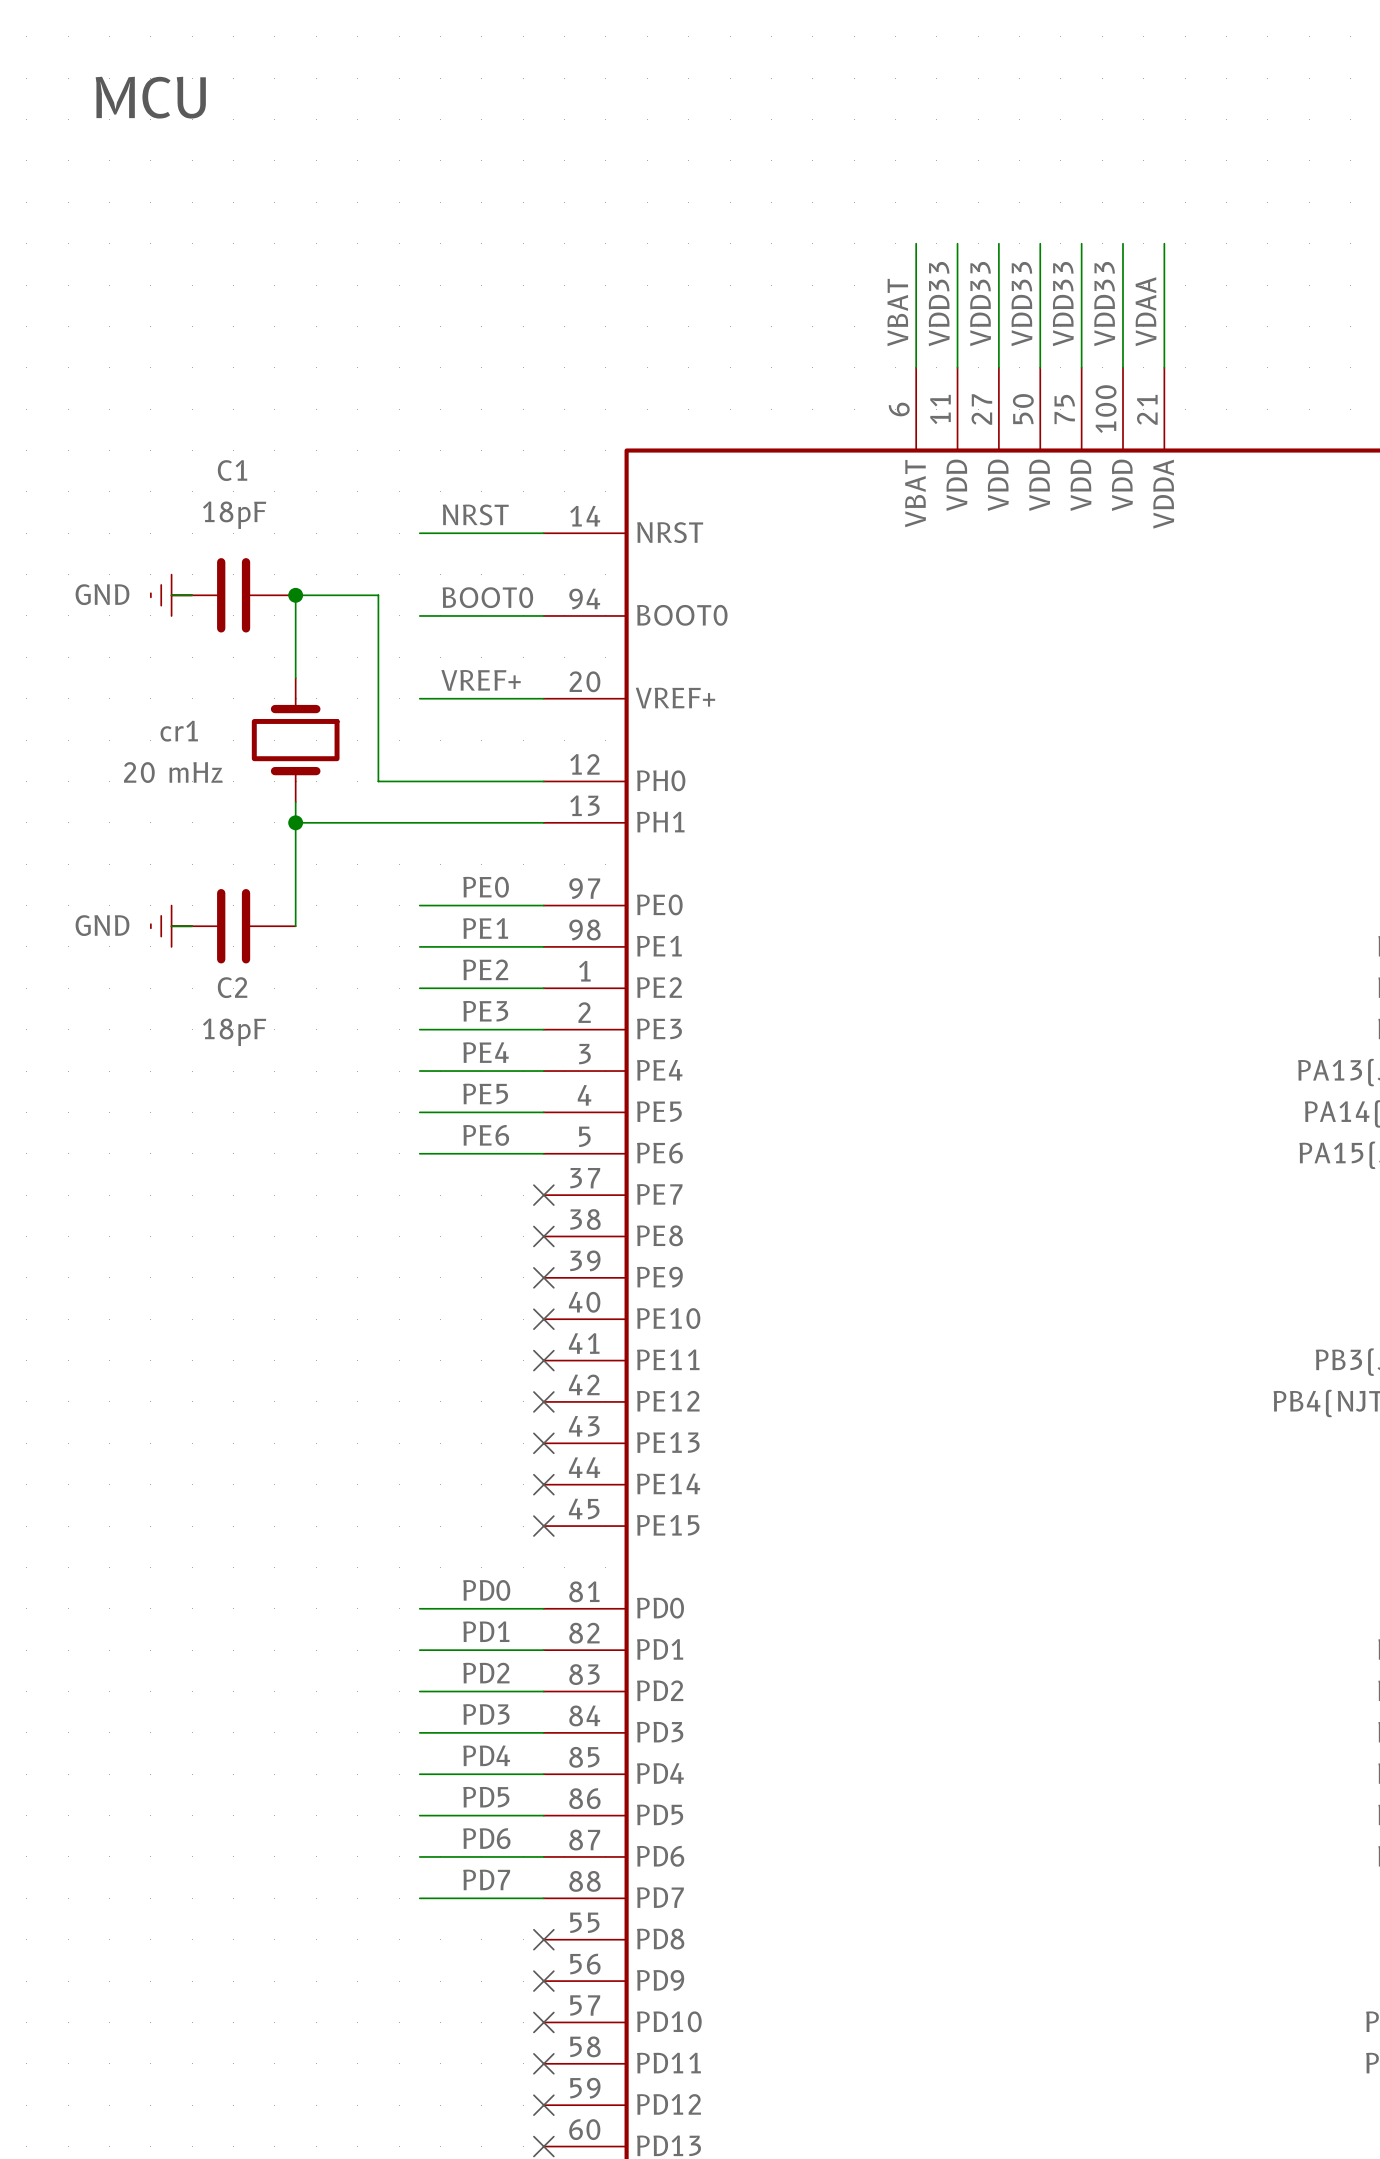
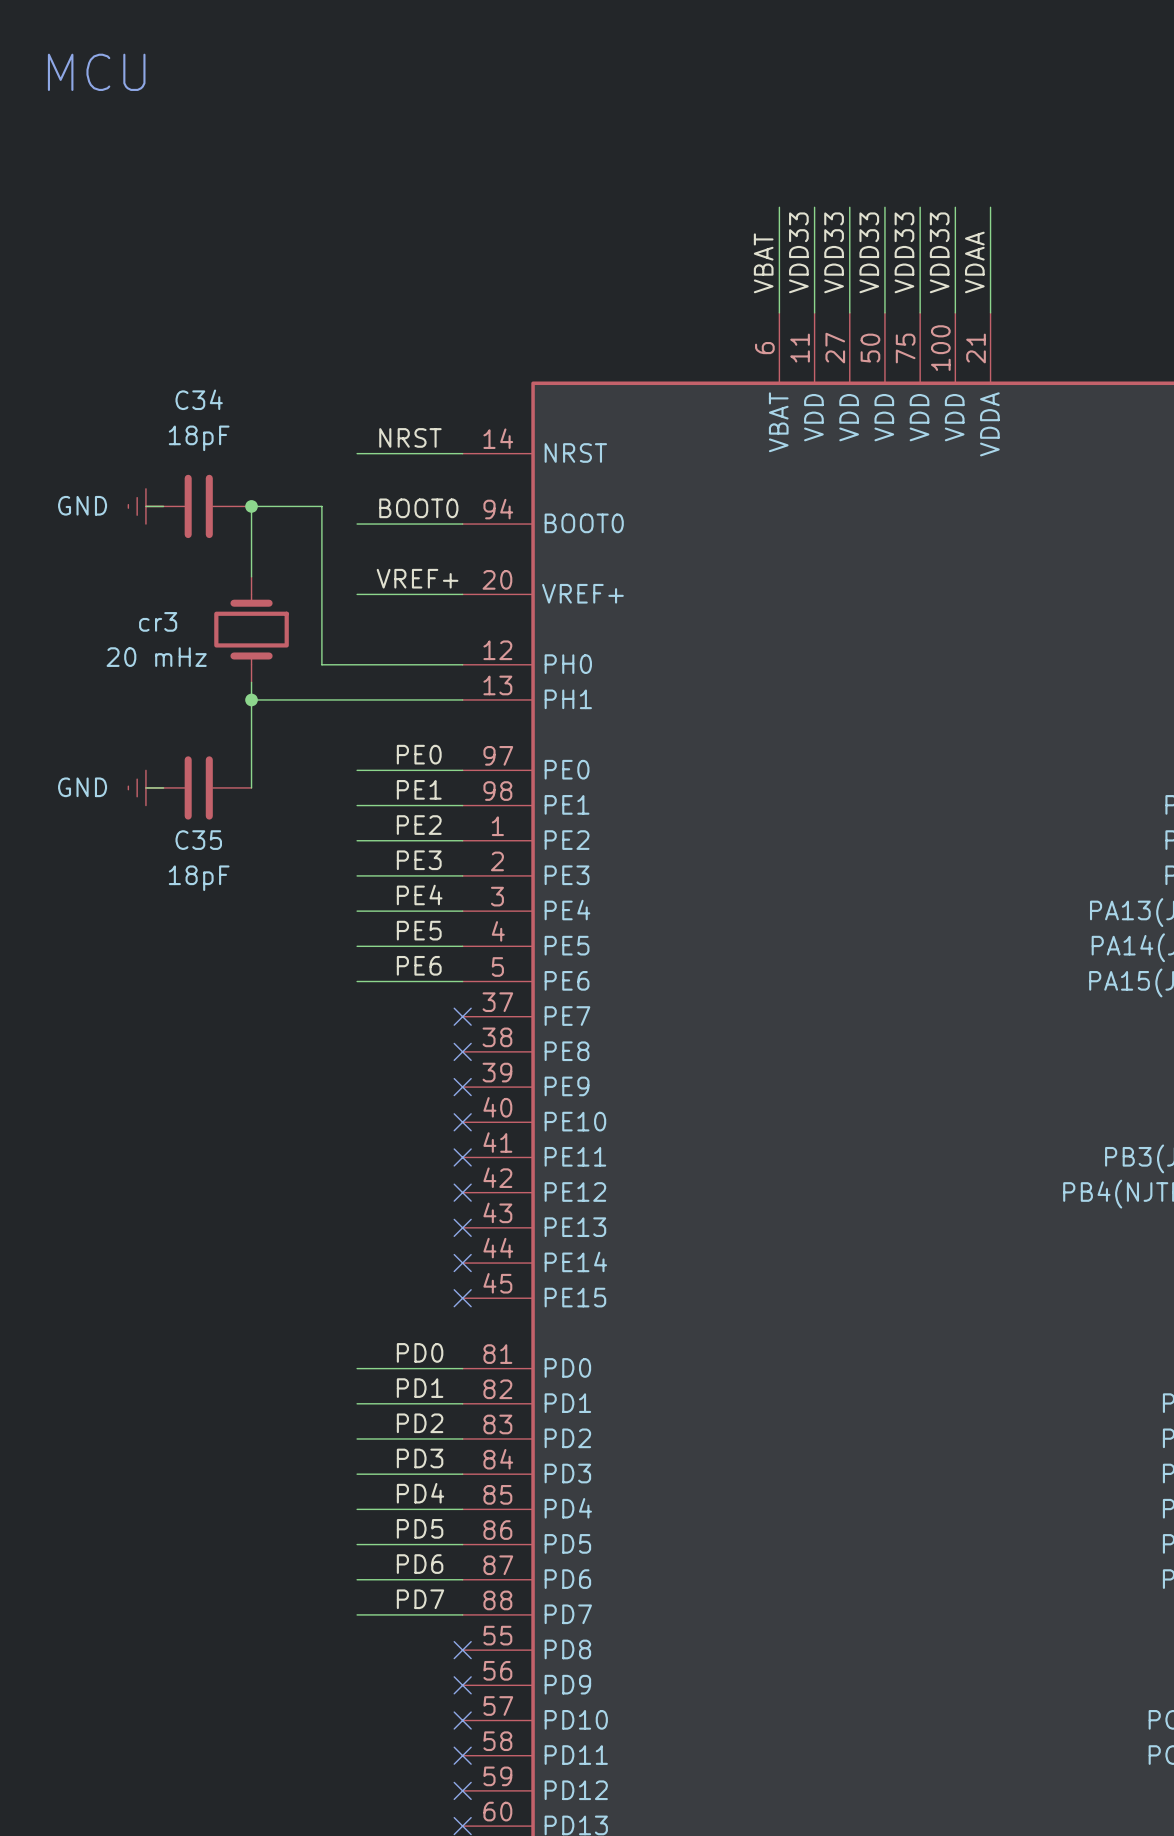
text position: MCU (150, 97) -> MCU (96, 72)
C1 name: C1 (232, 470) -> C34 (199, 399)
cr1 name: cr1 (179, 731) -> cr3 (158, 621)
C2 name: C2 (232, 987) -> C35 (198, 840)

